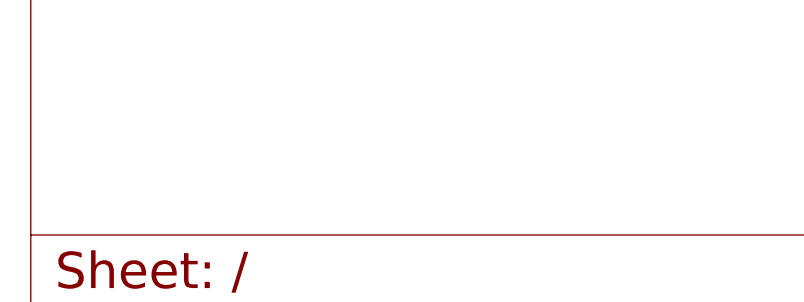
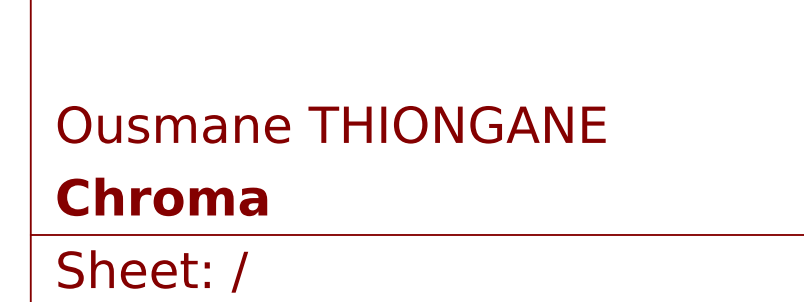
title block: none -> Ousmane THIONGANE (331, 124)
title block: none -> Chroma (162, 196)

